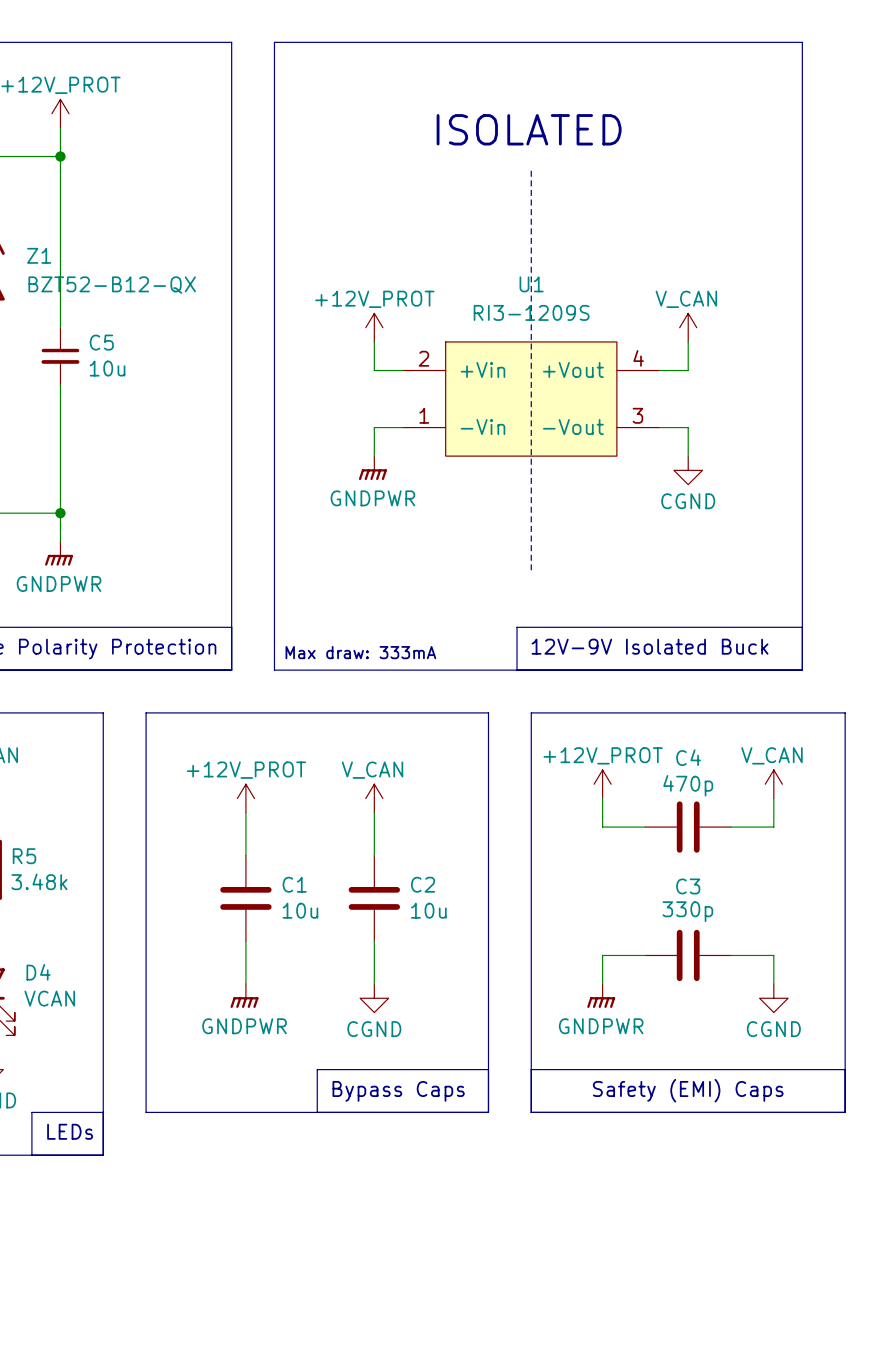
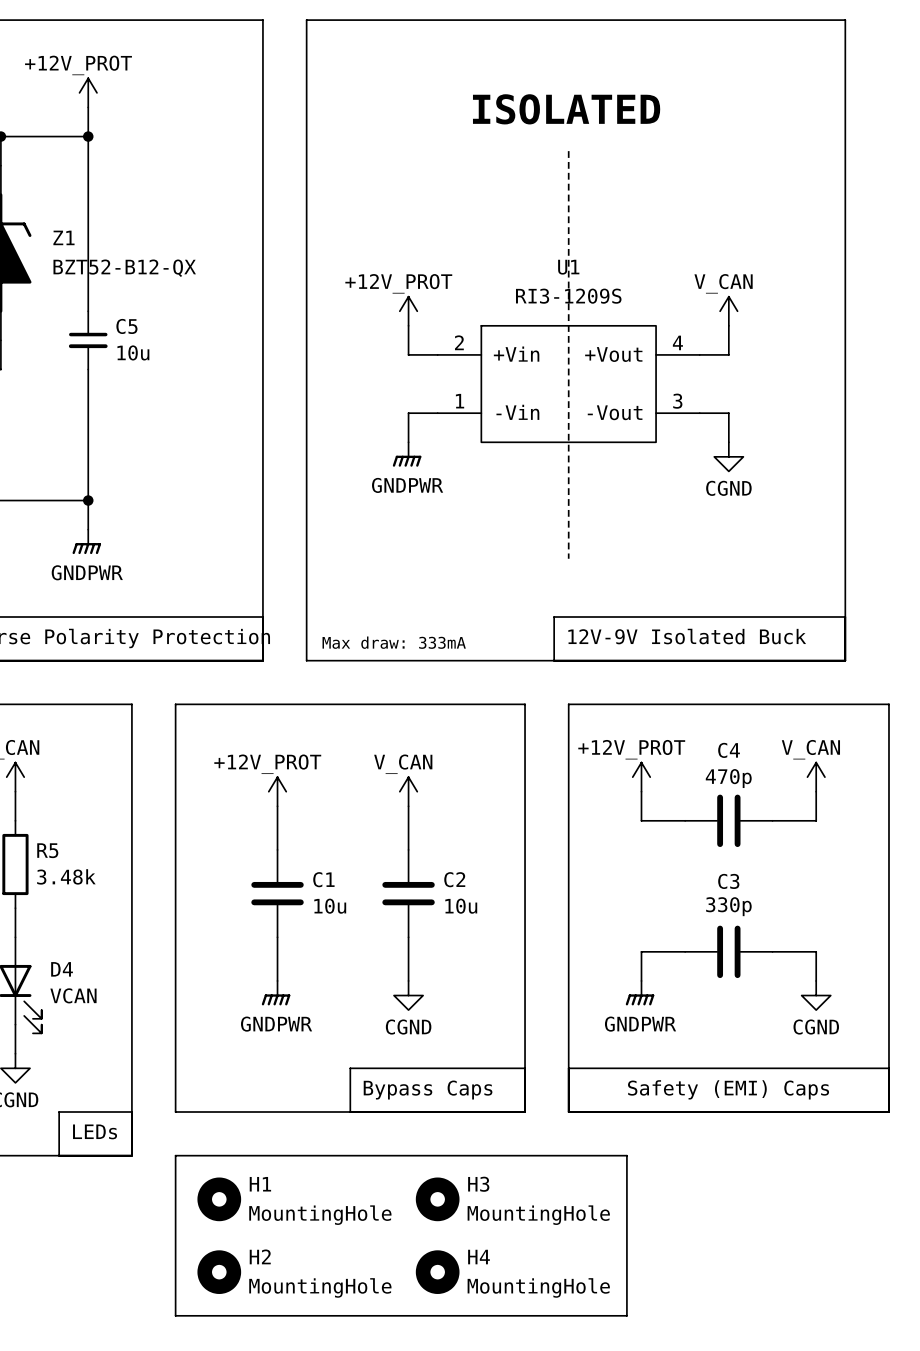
line: none -> (175, 1155) (626, 1155) (626, 1315) (175, 1315) (175, 1155)
H1: none -> MountingHole (219, 1199)
H3: none -> MountingHole (437, 1199)
H2: none -> MountingHole (219, 1272)
H4: none -> MountingHole (437, 1272)

